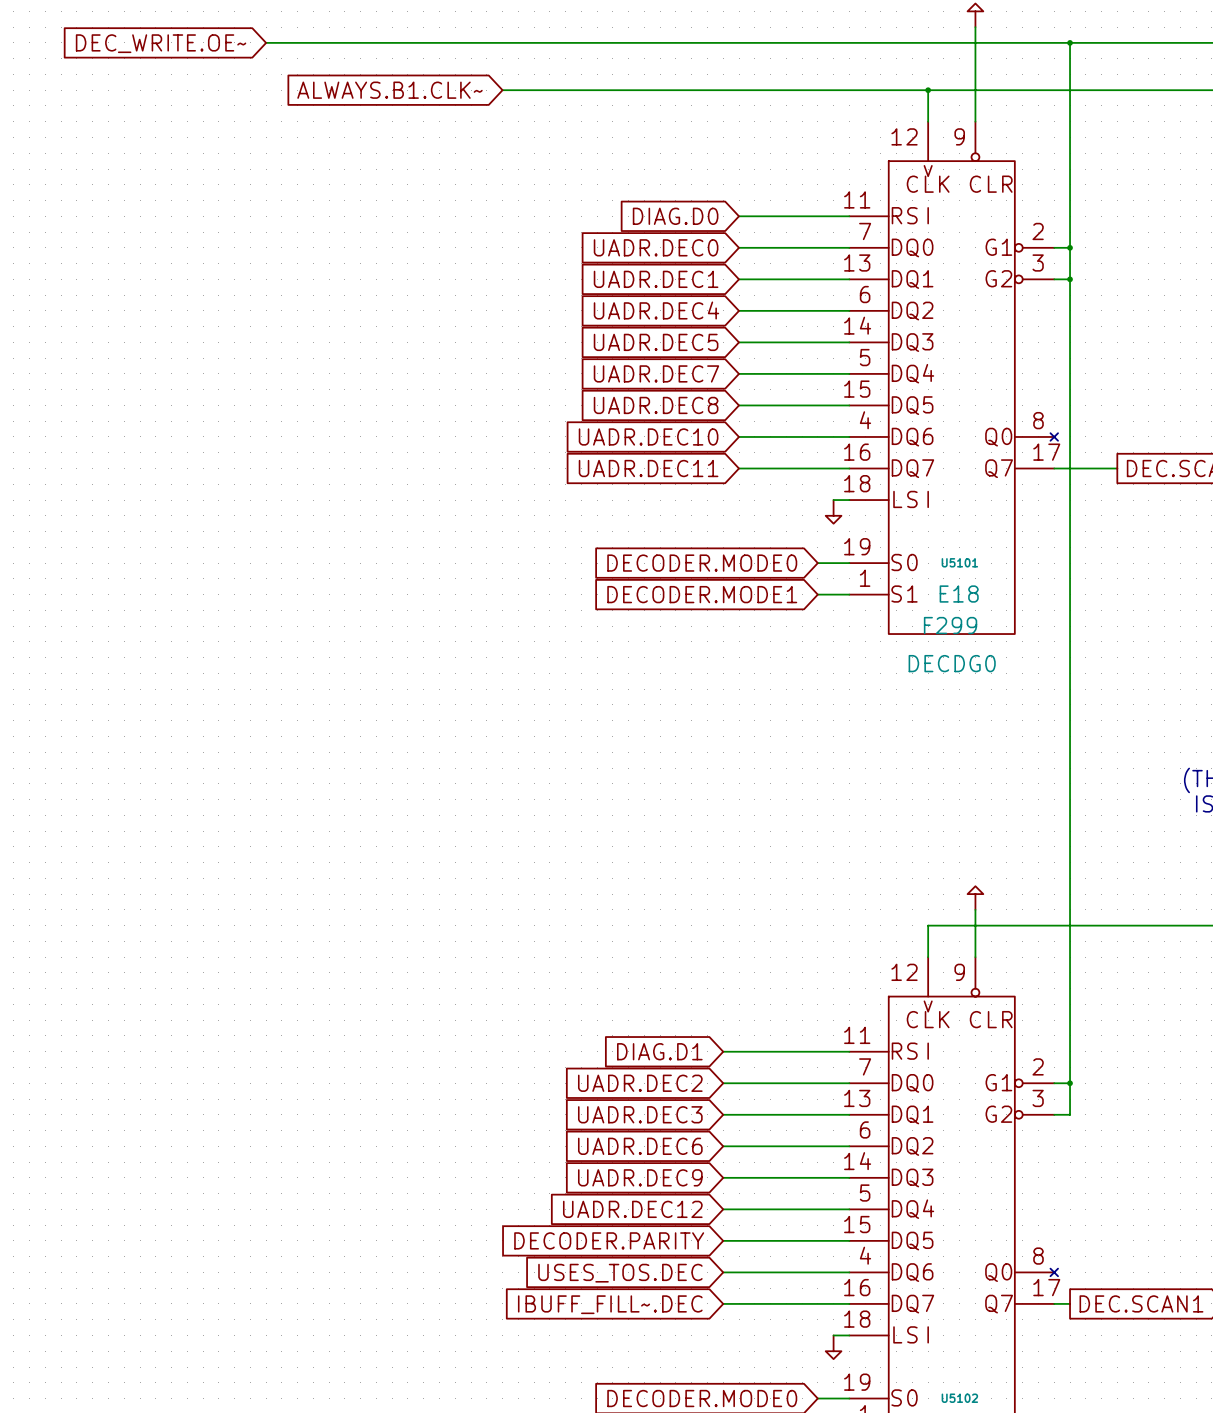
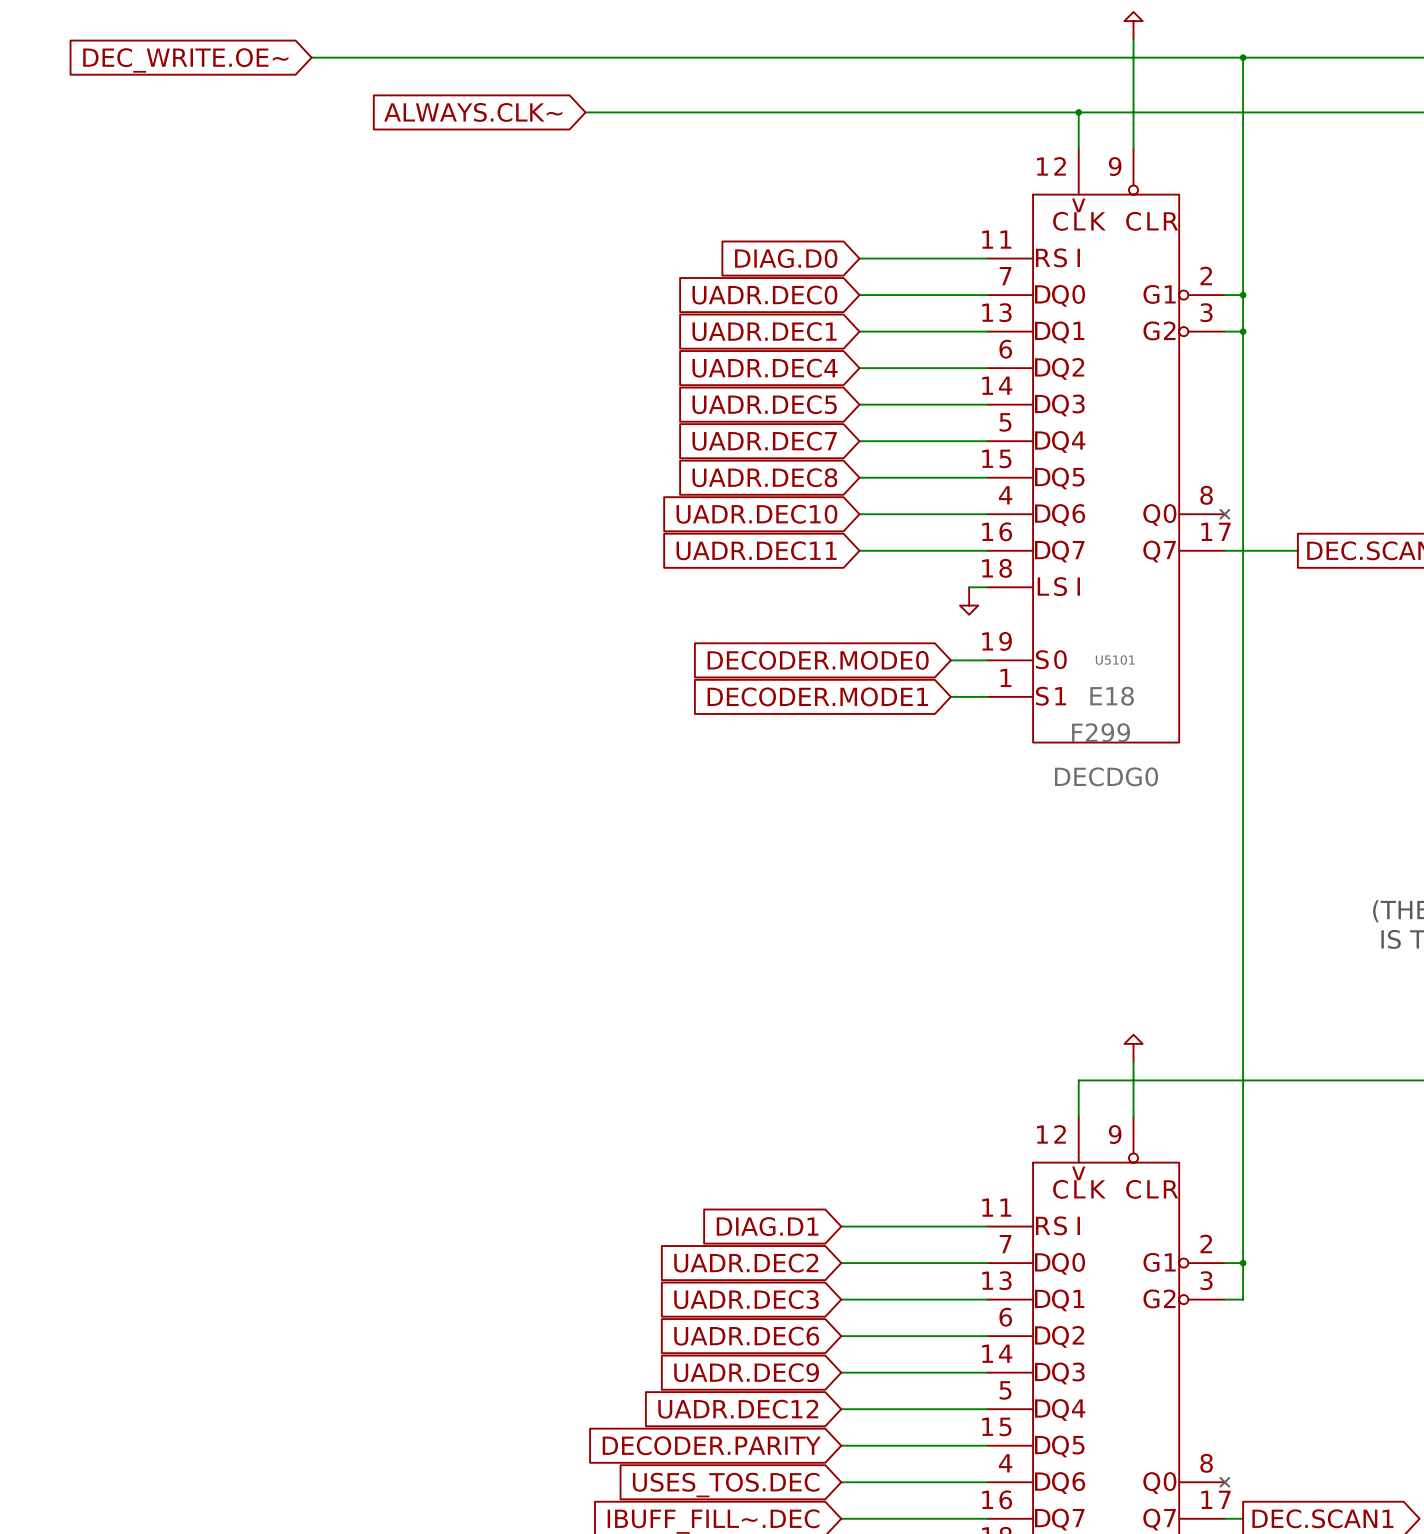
global label: ALWAYS.B1.CLK~ (389, 90) -> ALWAYS.CLK~ (473, 112)

